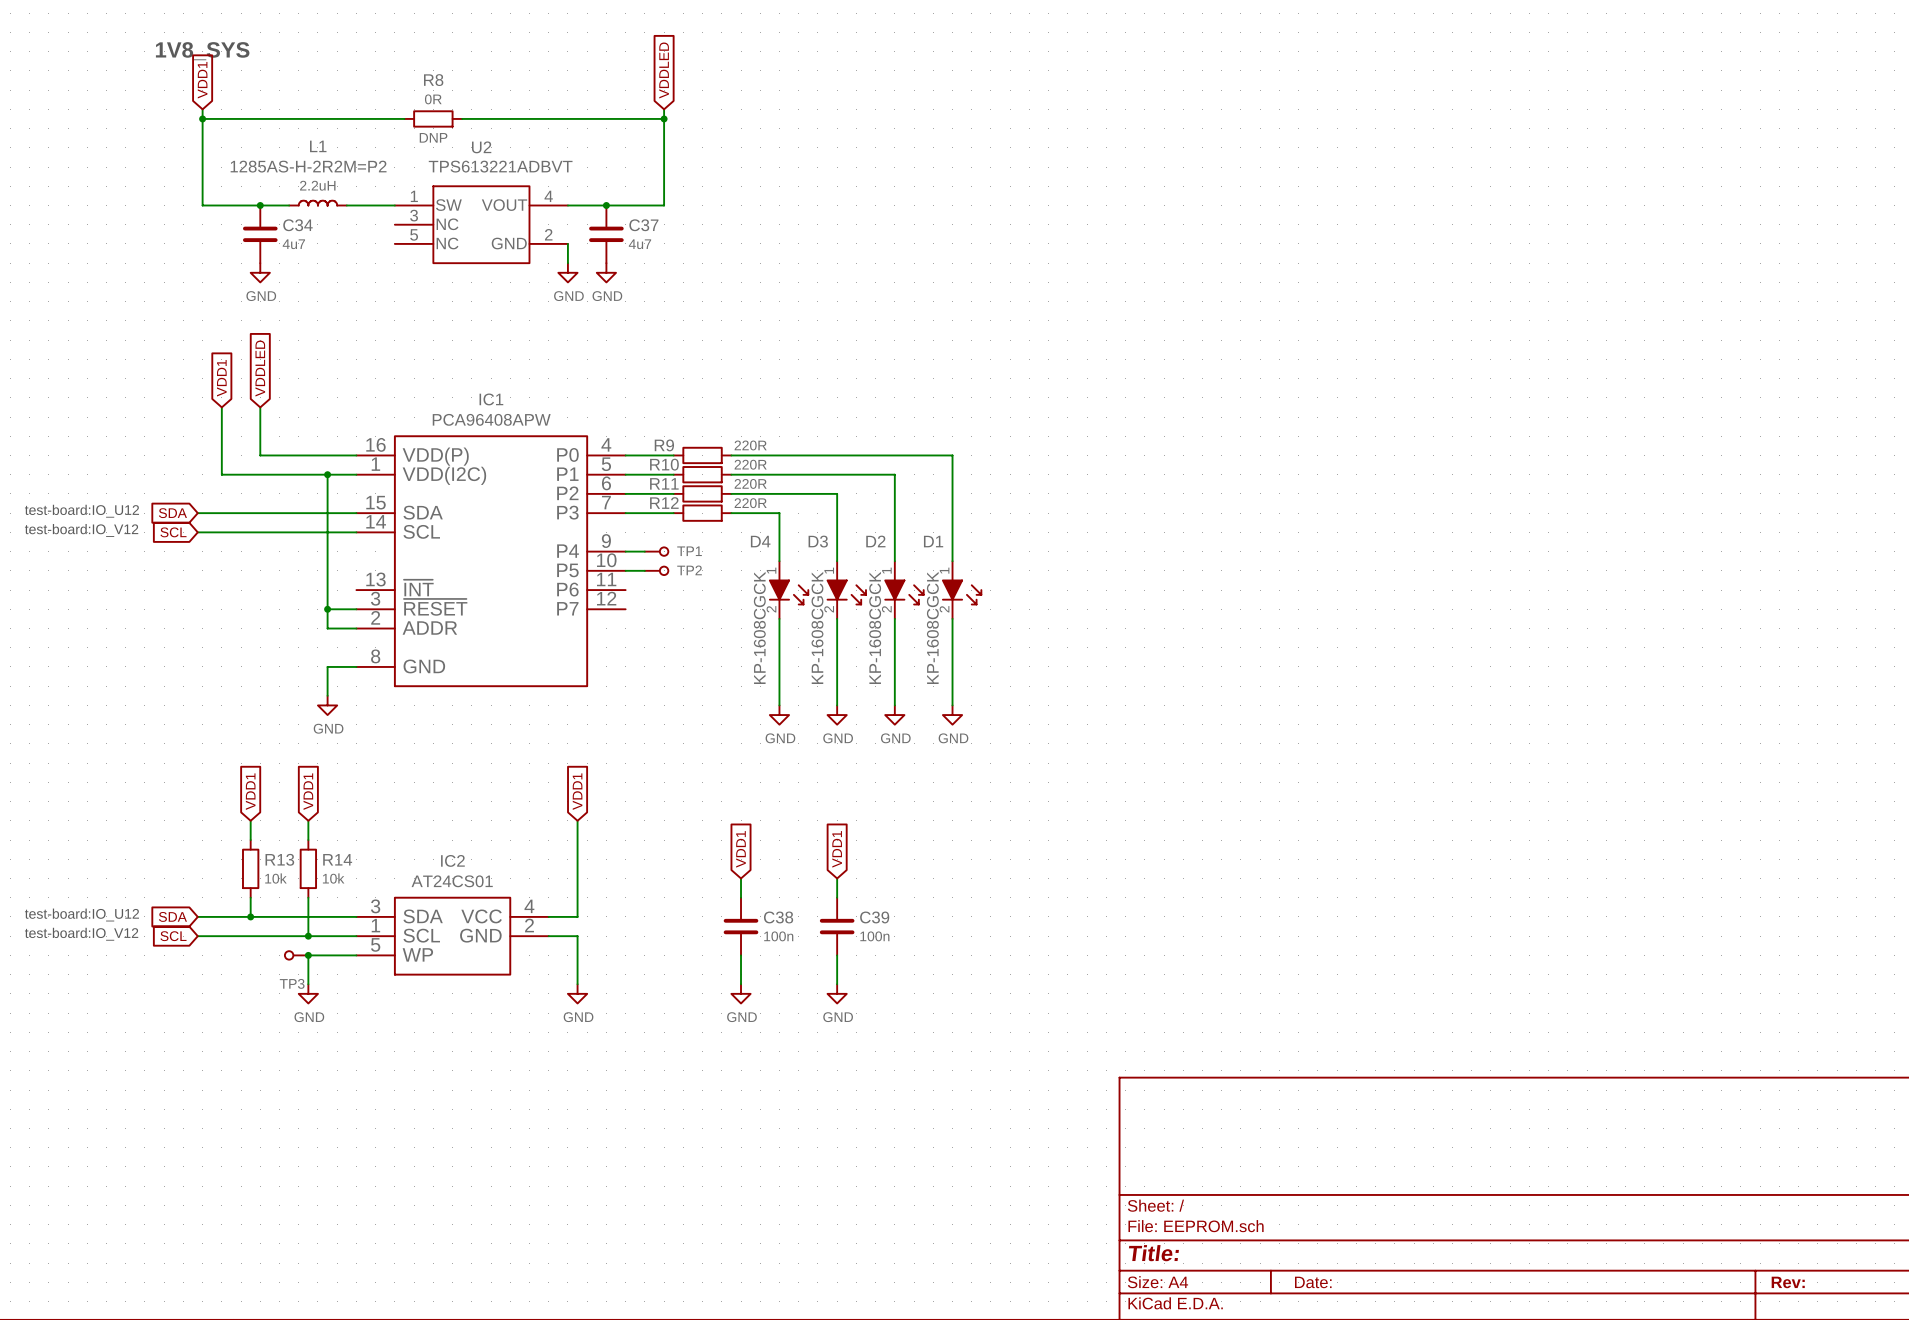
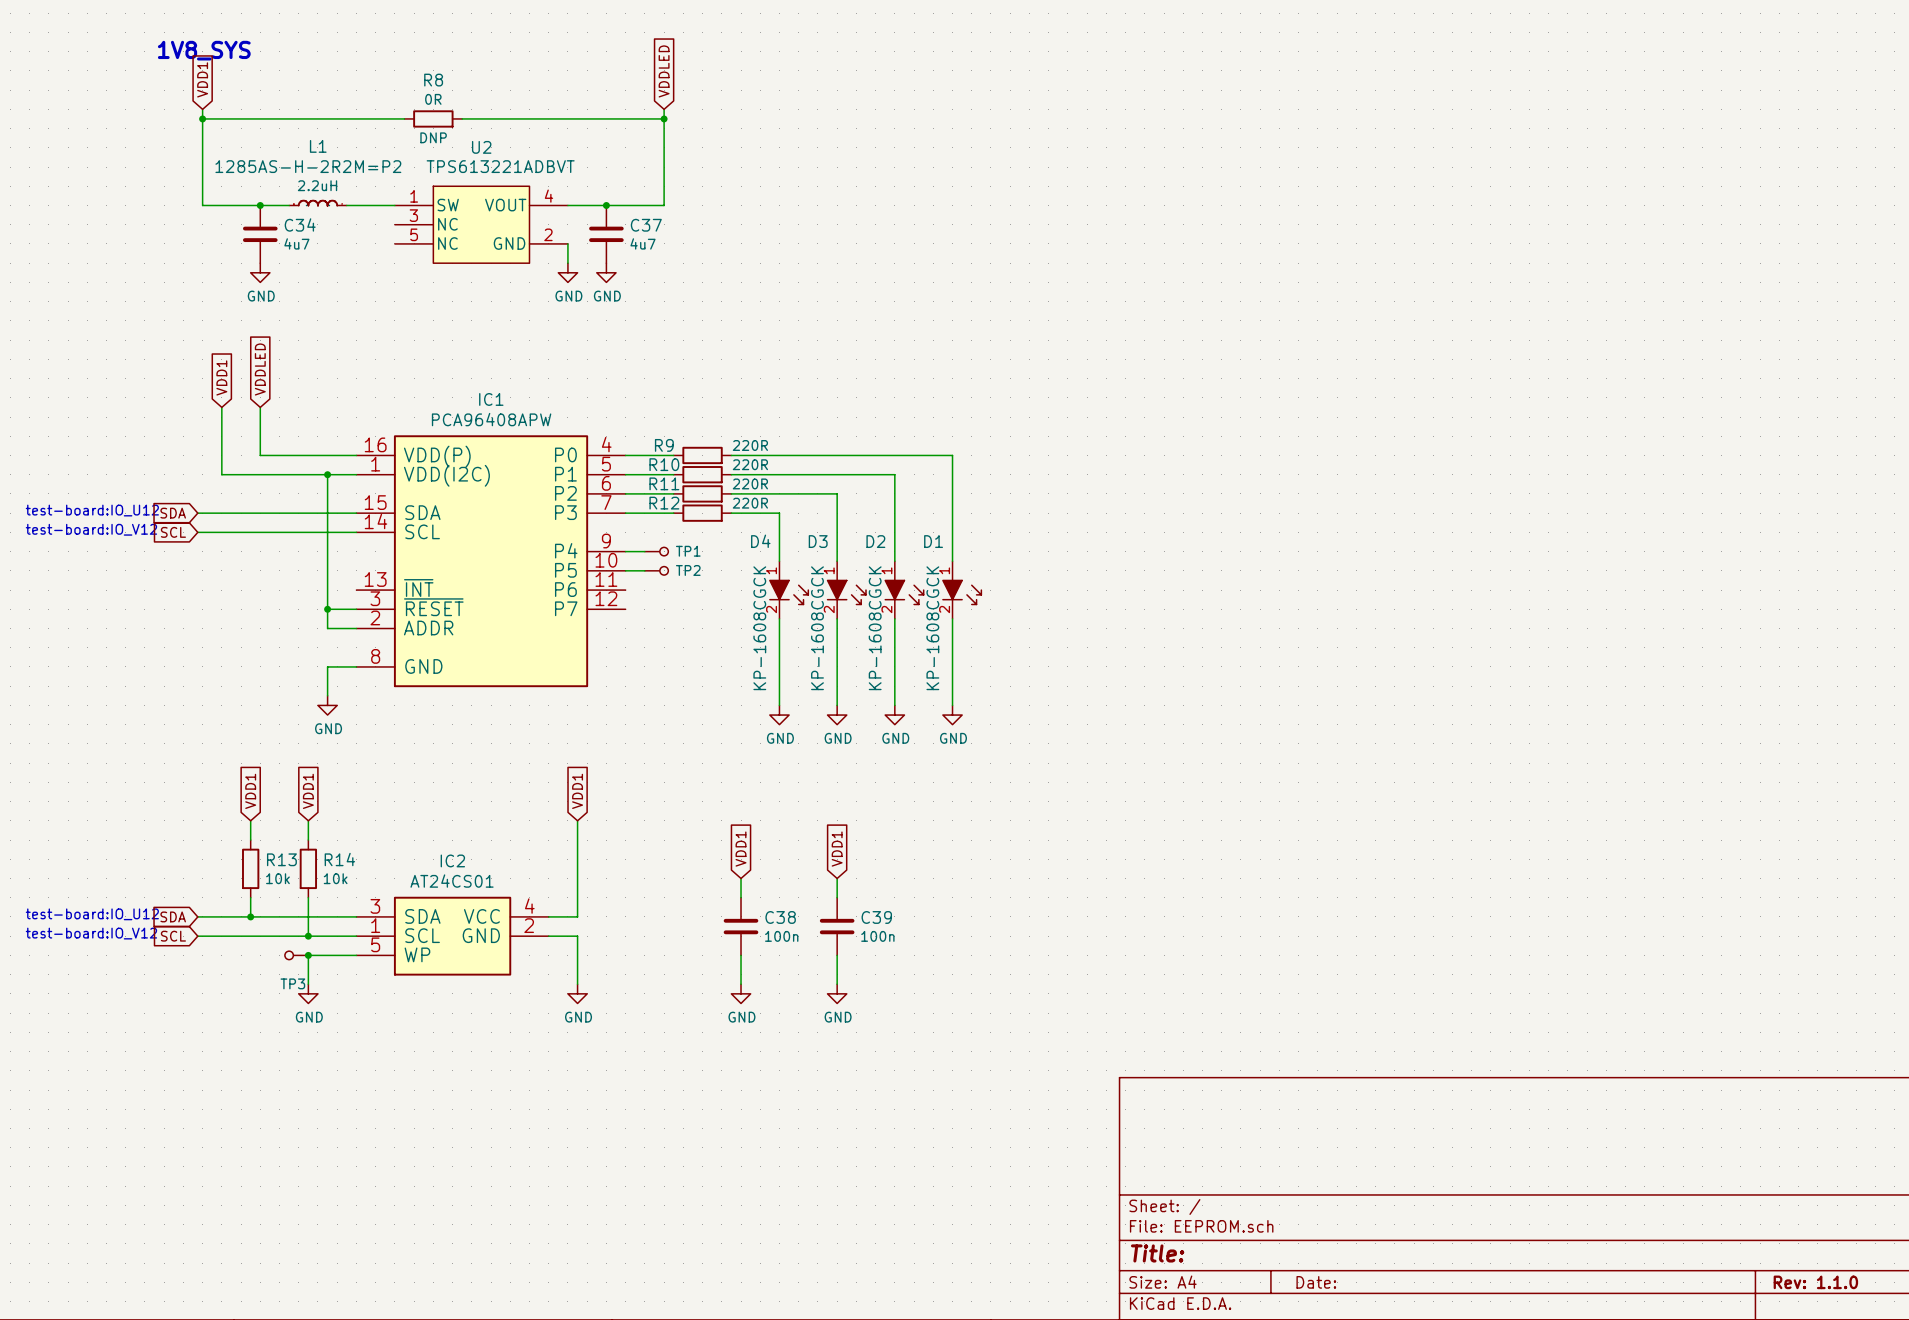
title block: Rev: (1788, 1282) -> Rev: 1.1.0 (1815, 1282)

